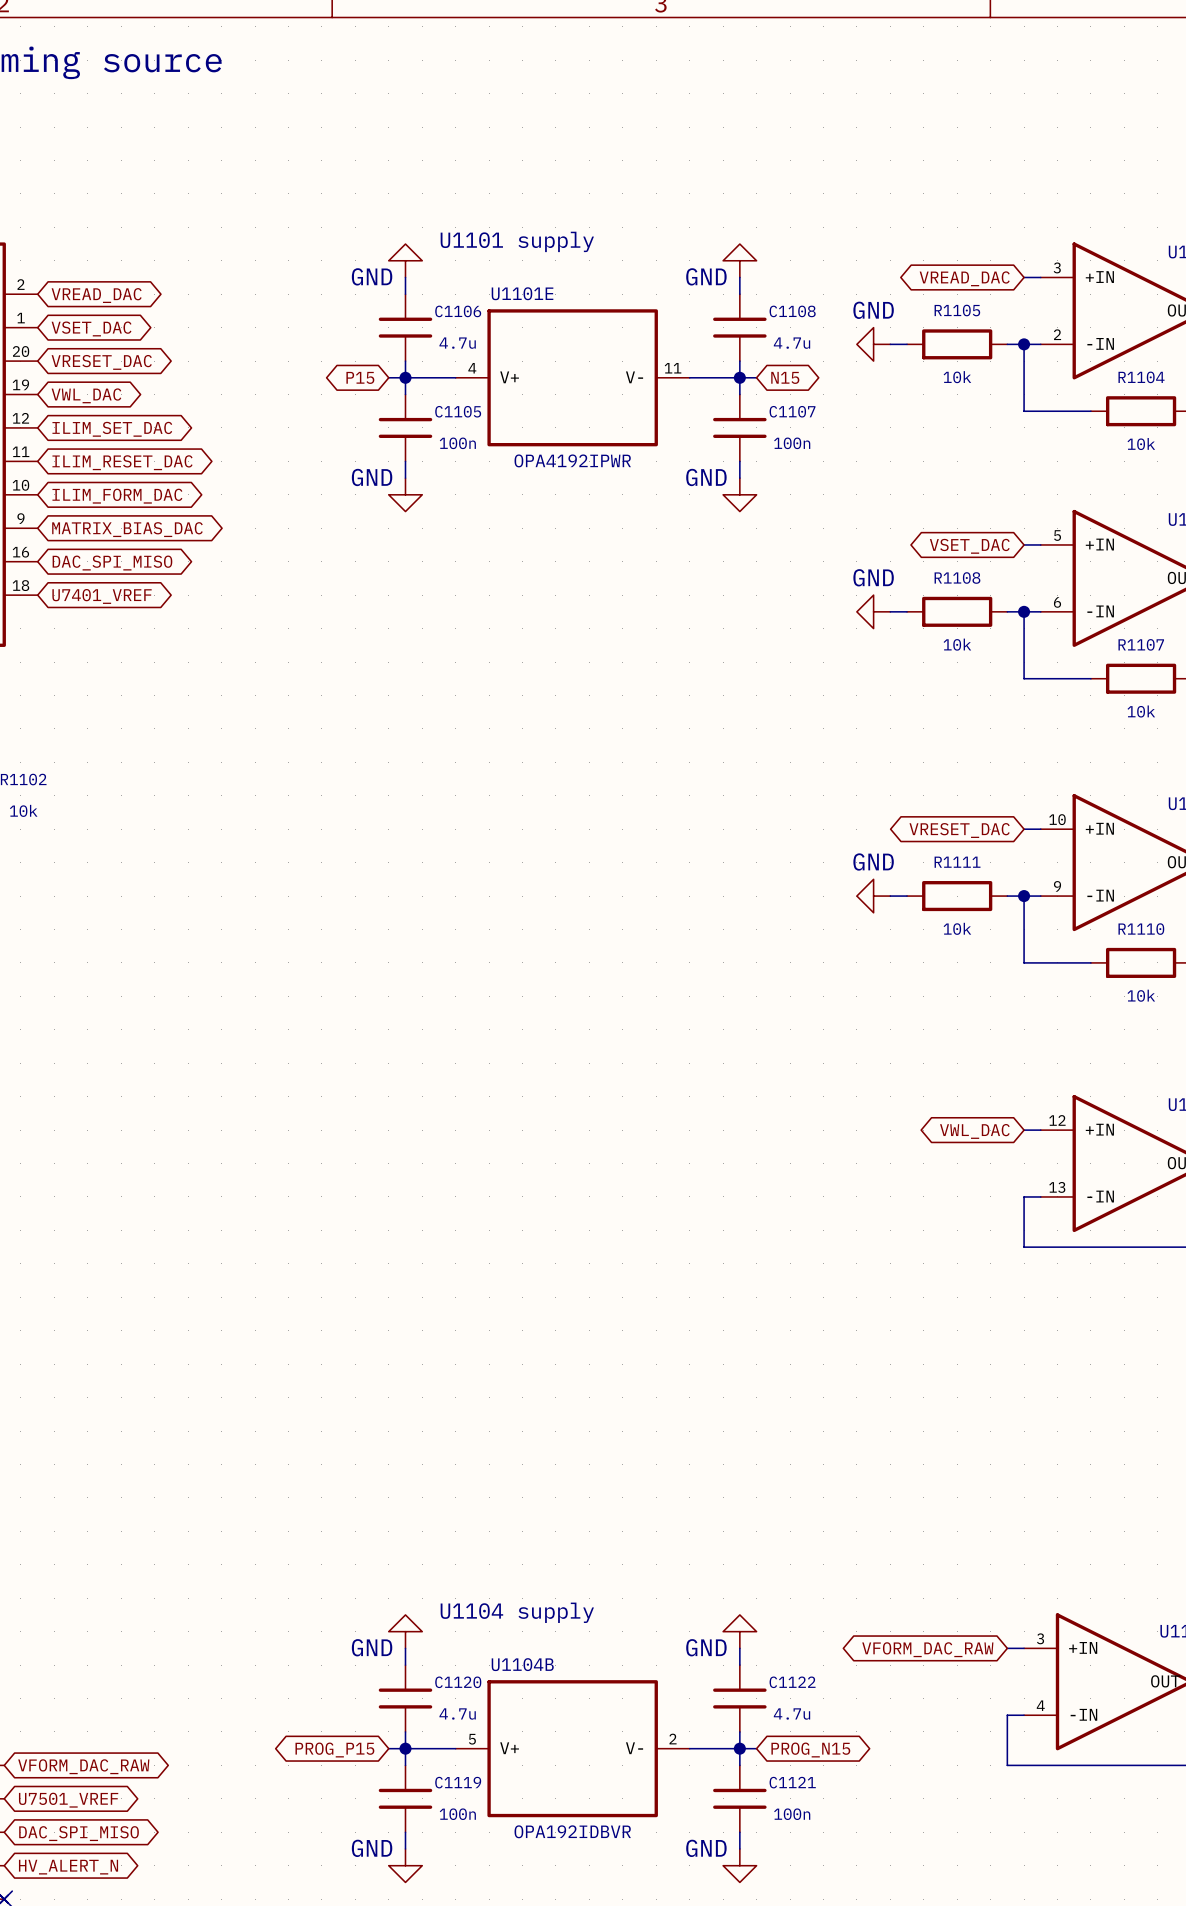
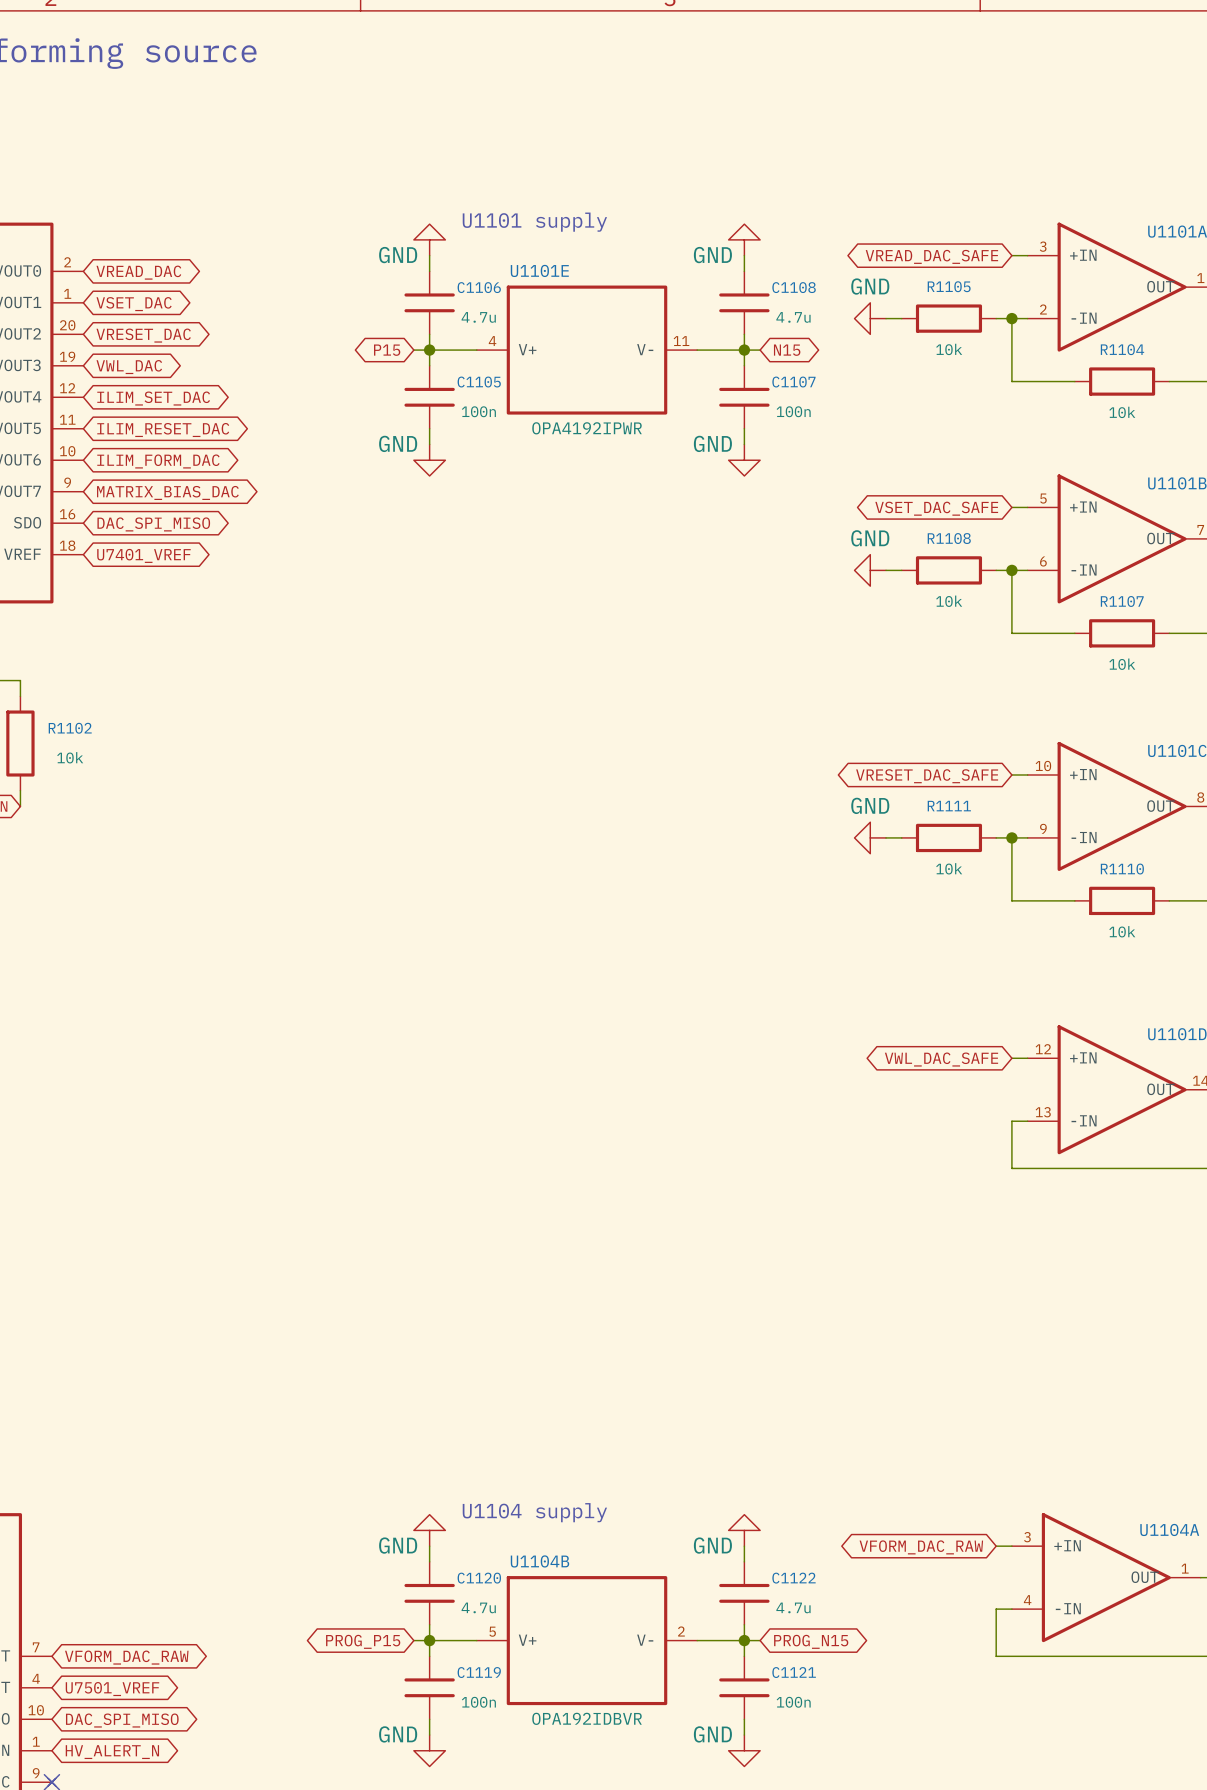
global label: VREAD_DAC (964, 278) -> VREAD_DAC_SAFE (931, 256)
global label: VSET_DAC (969, 546) -> VSET_DAC_SAFE (936, 508)
global label: VRESET_DAC (959, 830) -> VRESET_DAC_SAFE (927, 776)
global label: VWL_DAC (974, 1131) -> VWL_DAC_SAFE (941, 1059)

